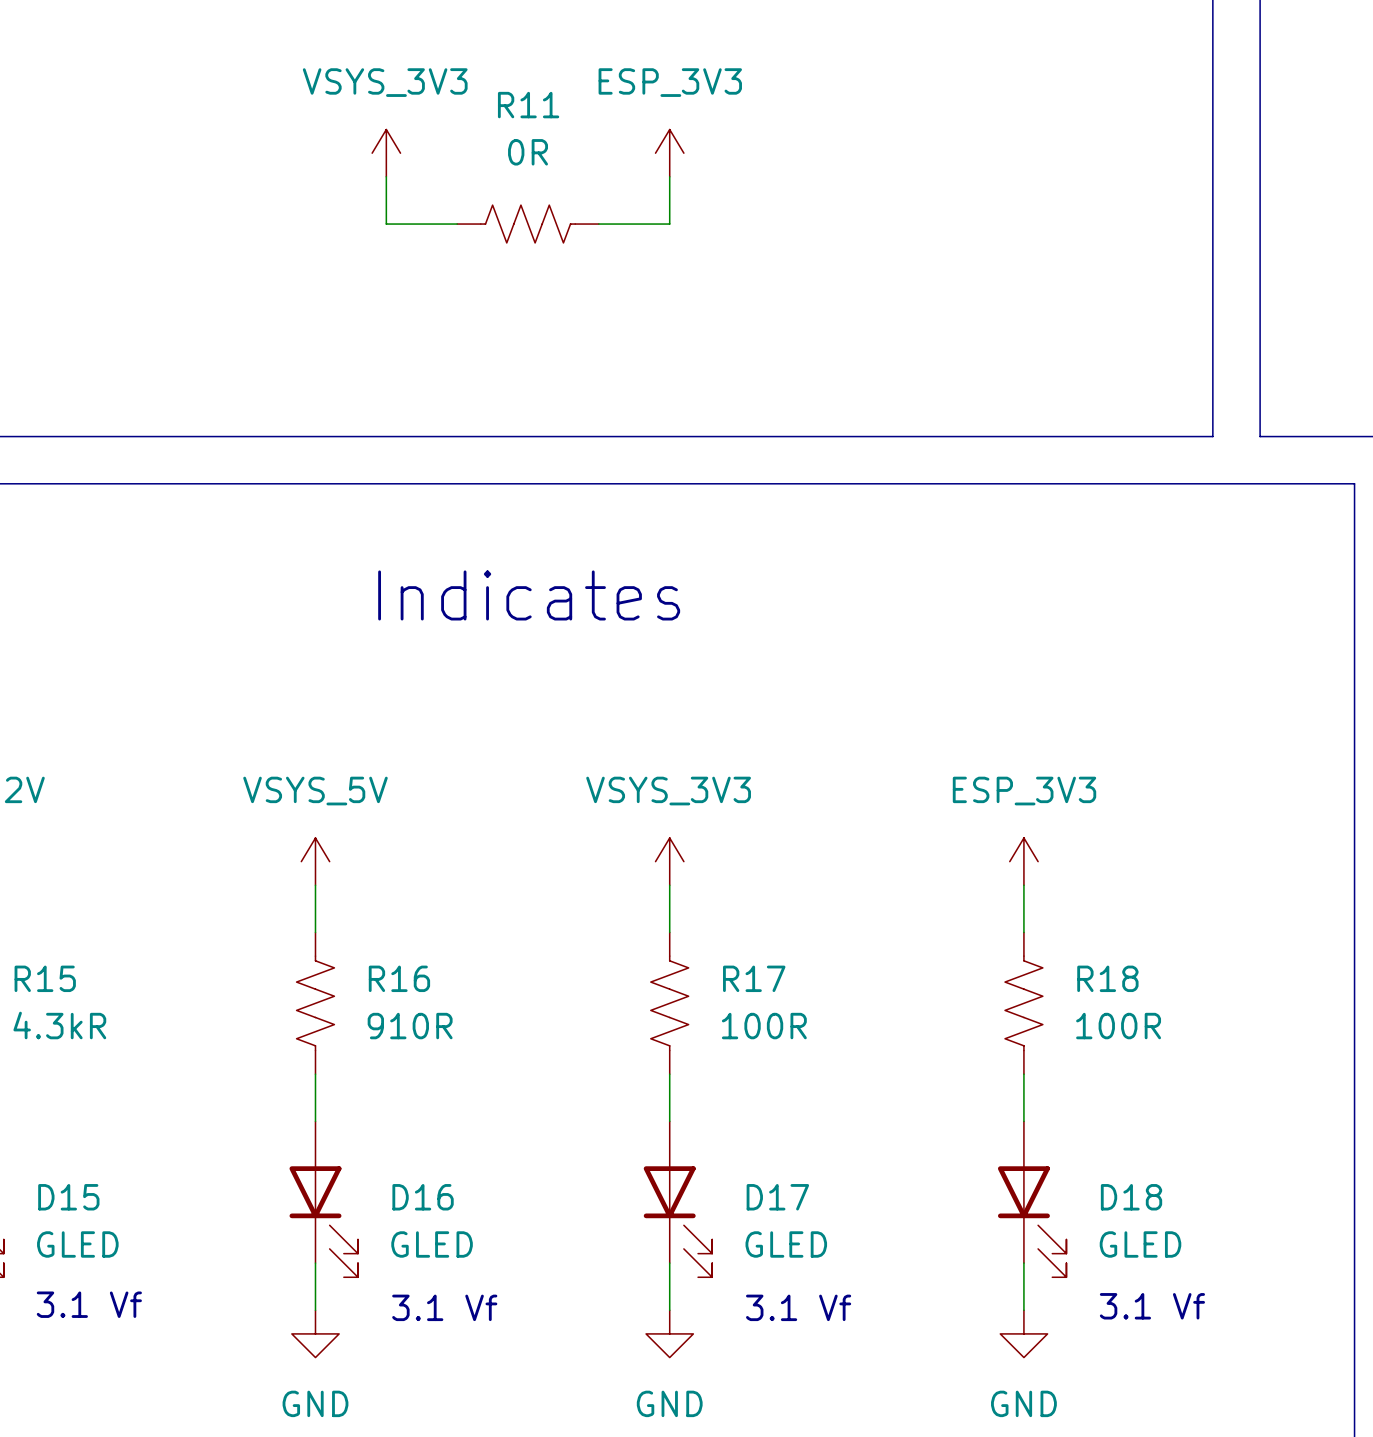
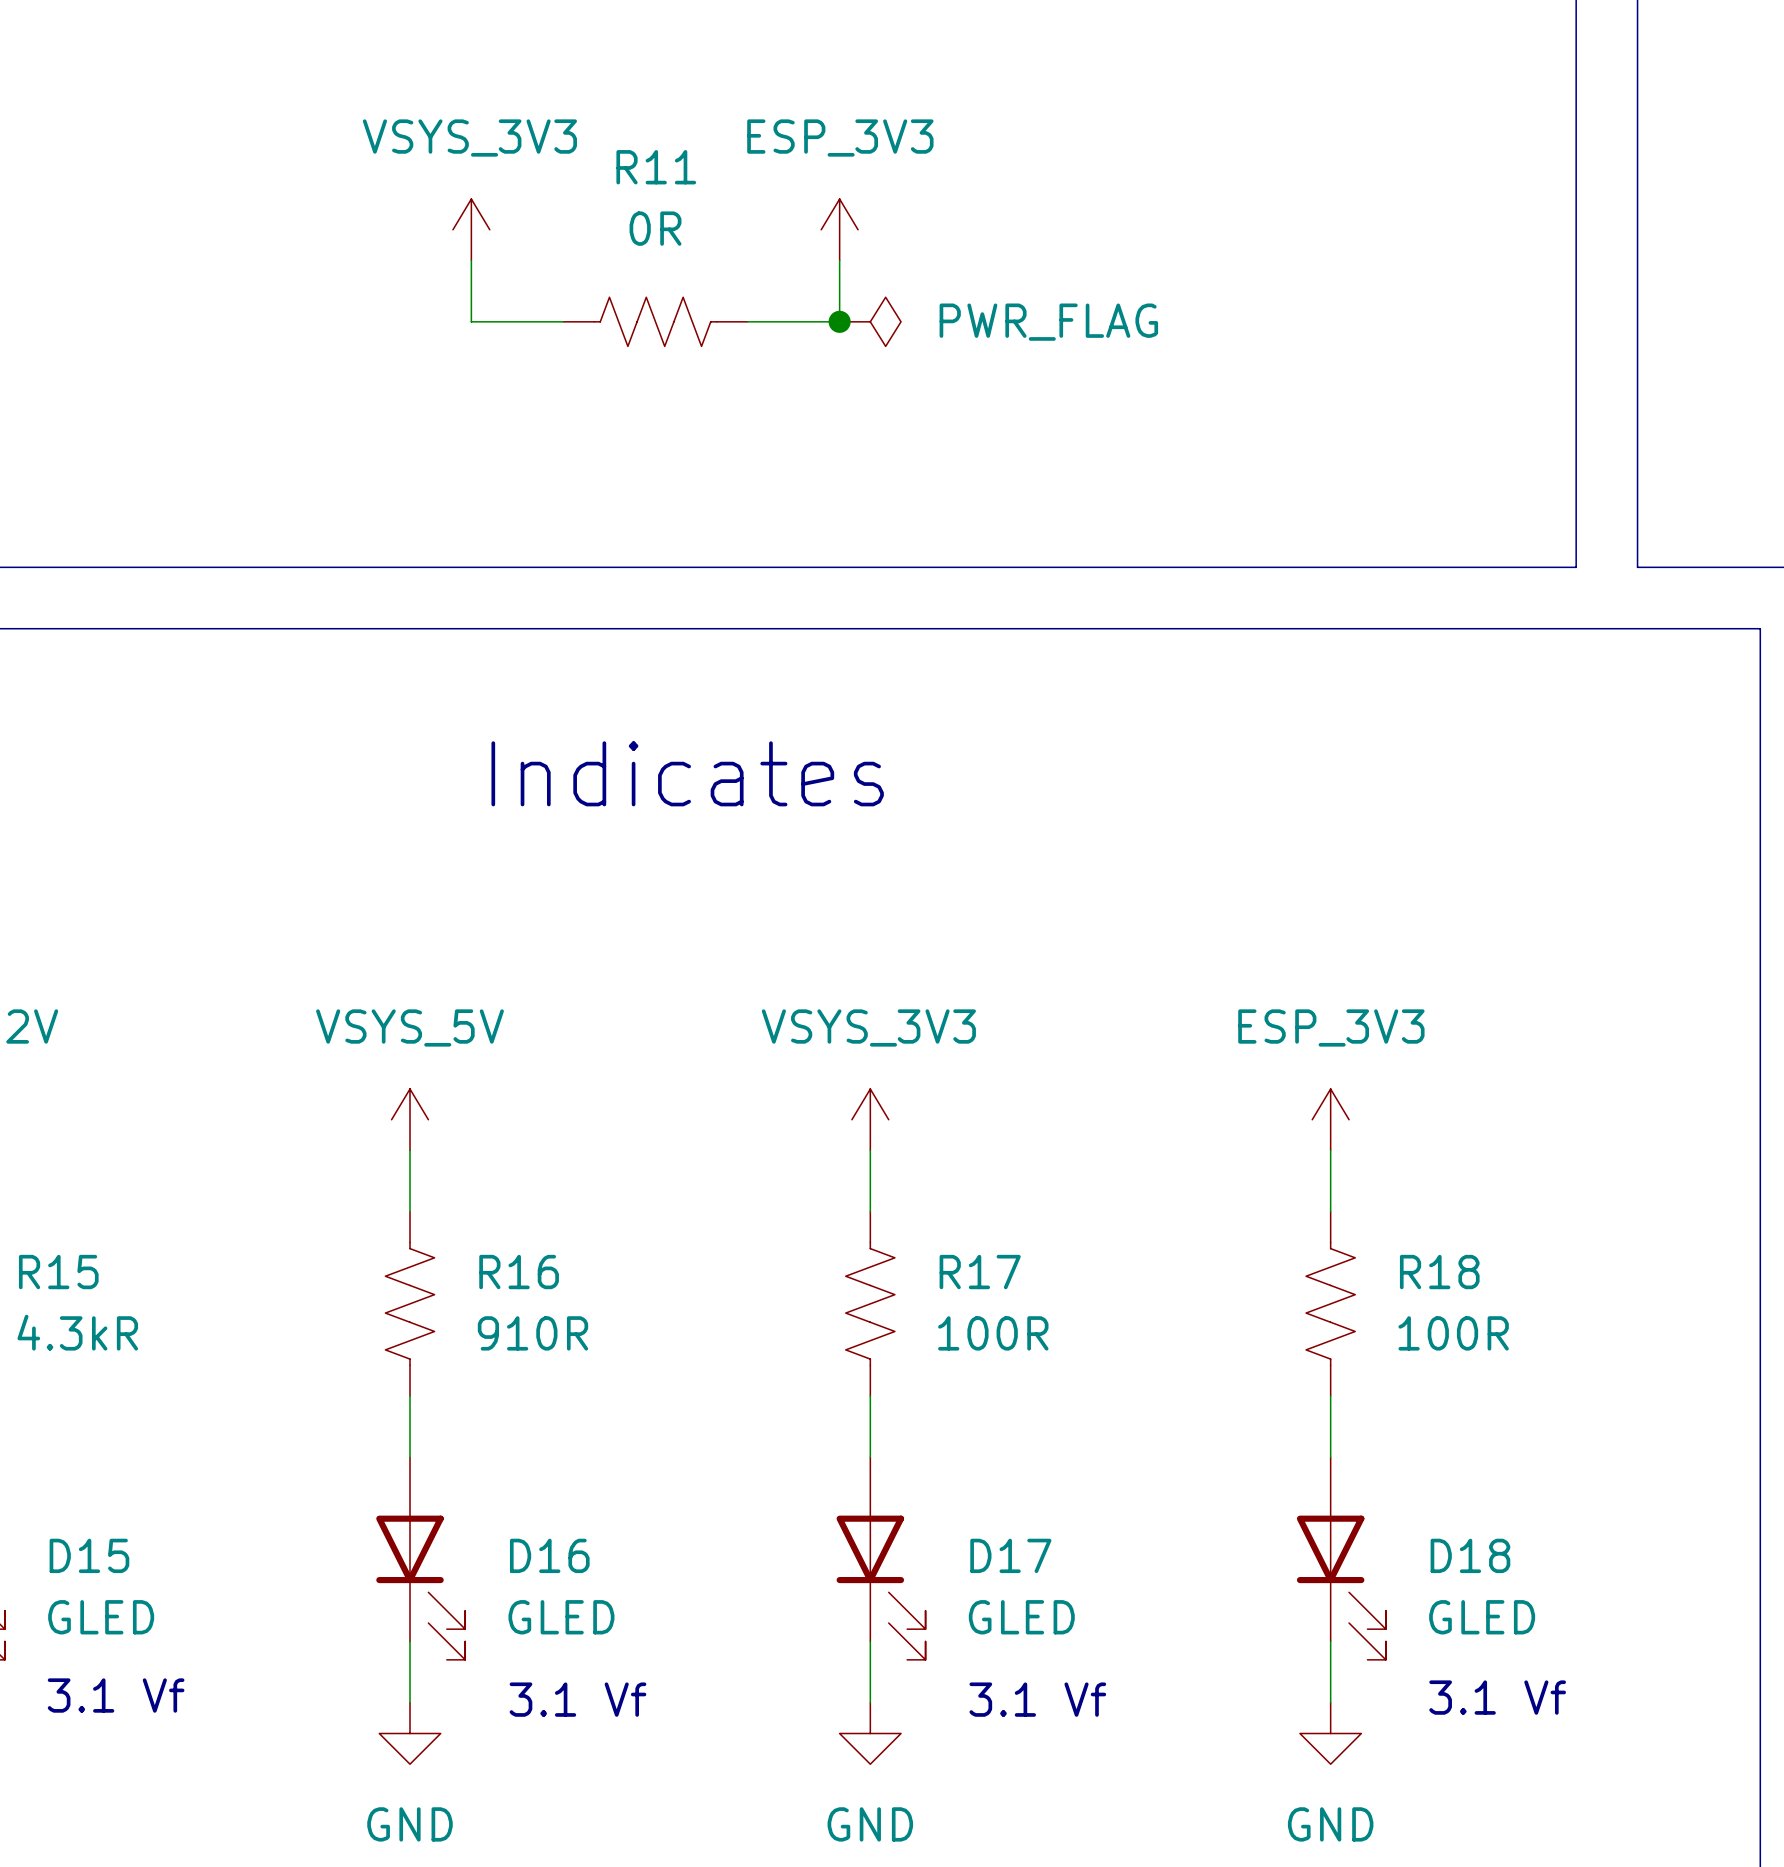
power symbol position: VSYS_3V3 (386, 153) -> VSYS_3V3 (471, 229)
power symbol position: ESP_3V3 (669, 153) -> ESP_3V3 (839, 229)
wire: (386, 176) (386, 224) (457, 224) -> (471, 260) (471, 321) (563, 321)
wire: (669, 176) (669, 224) (598, 224) -> (839, 260) (839, 321) (747, 321)
R11 position: (528, 224) -> (655, 321)
junction: none -> (839, 321)
power symbol: none -> PWR_FLAG (870, 321)

